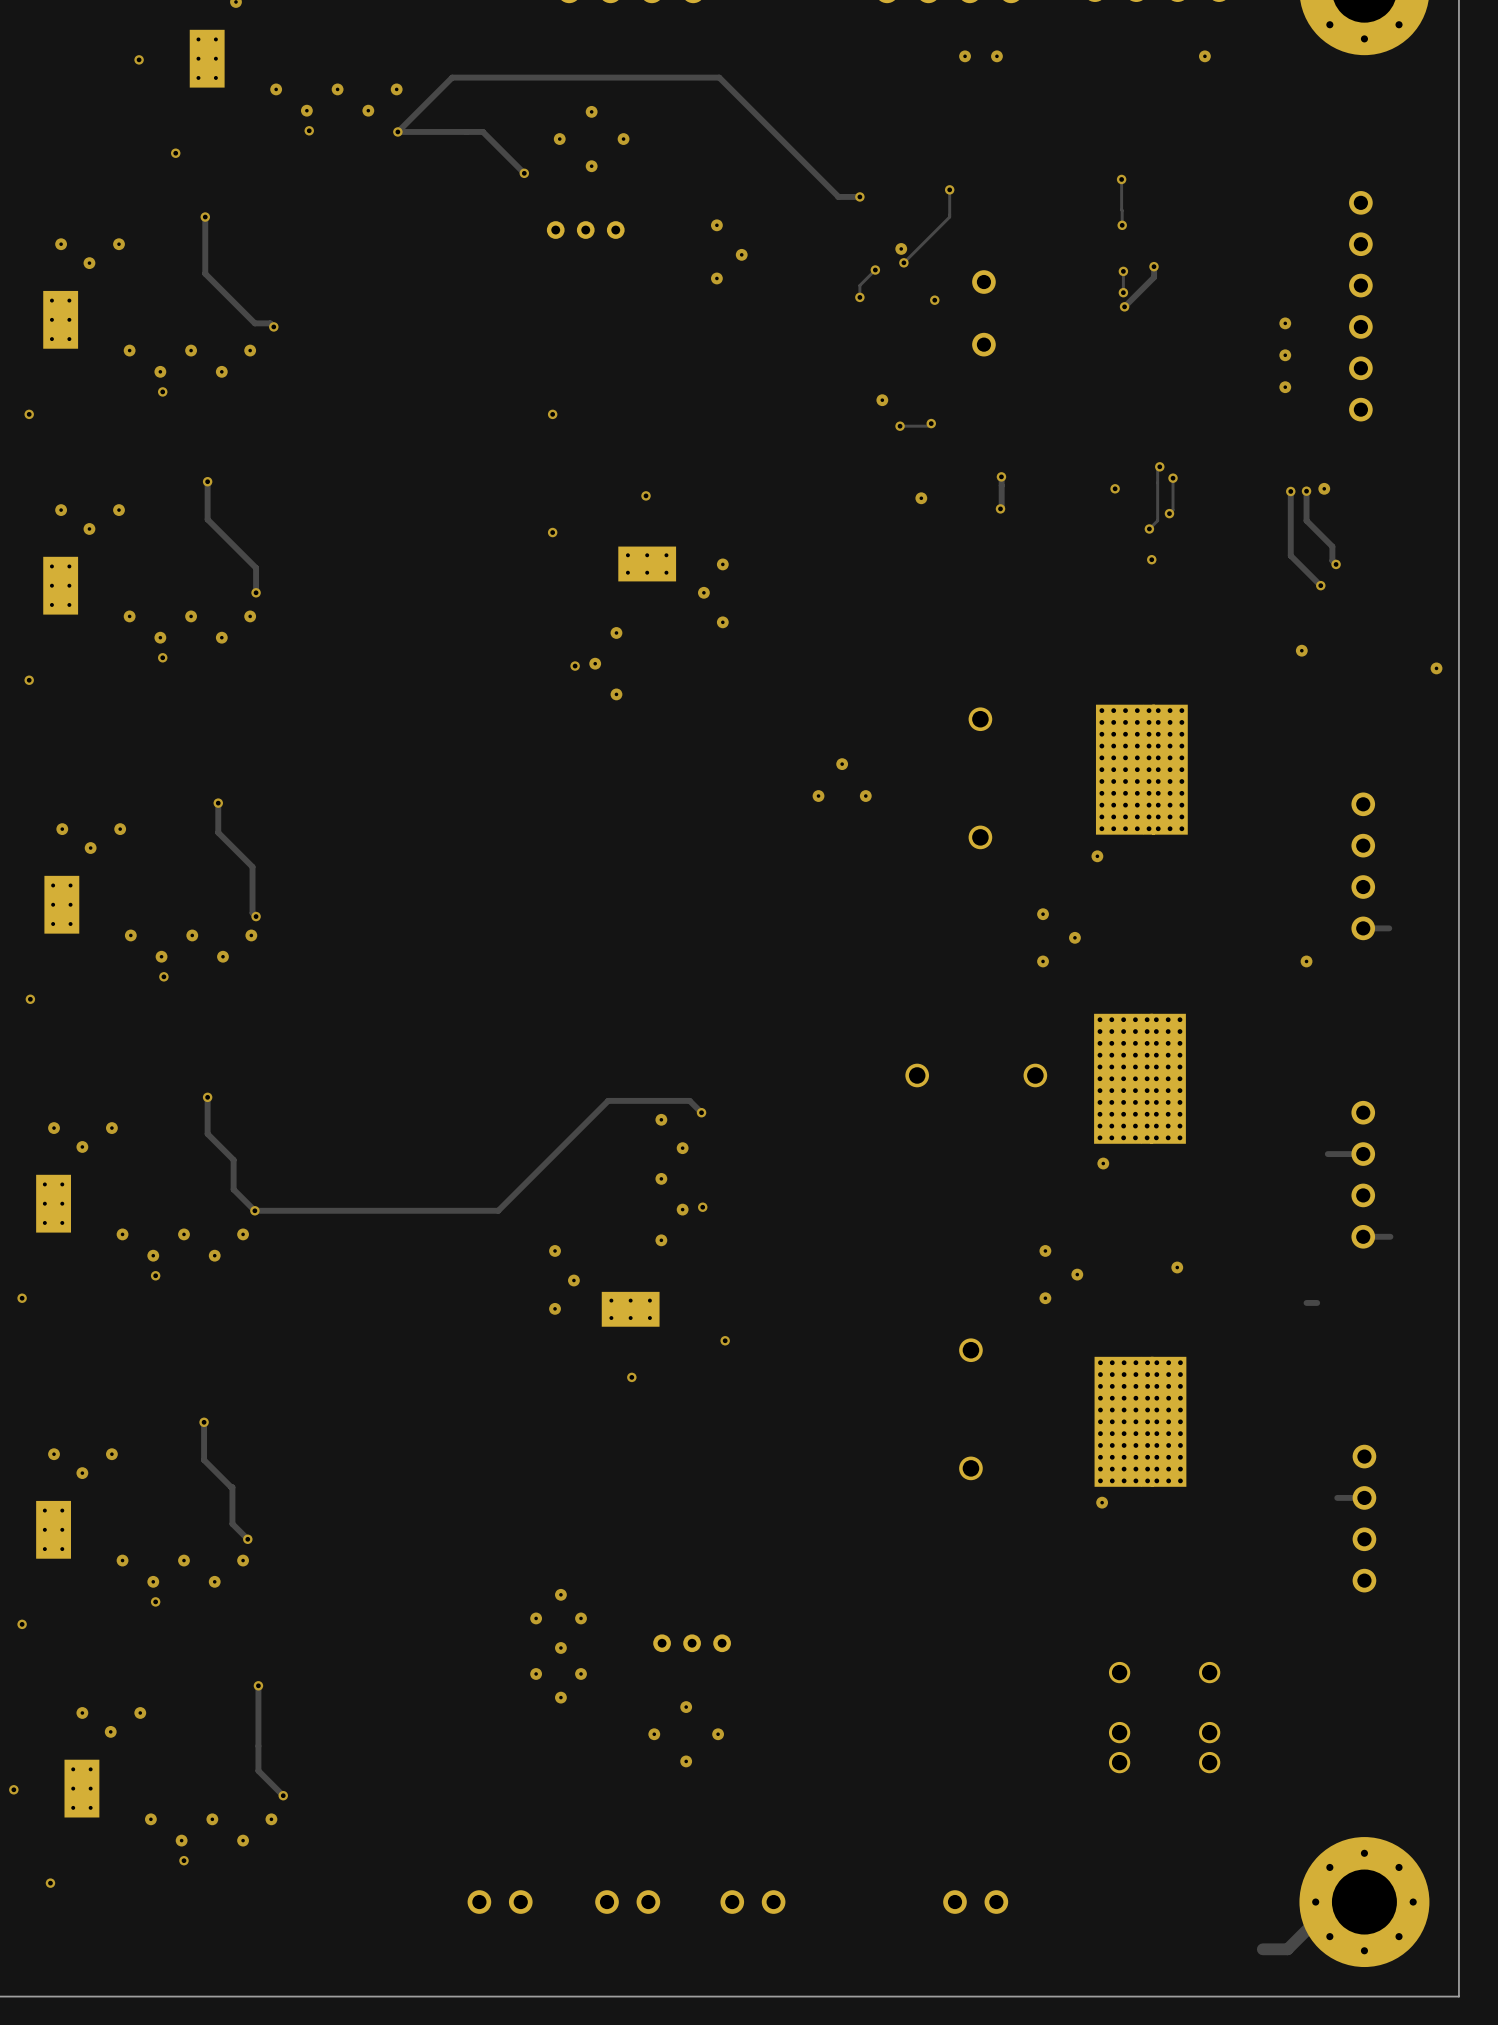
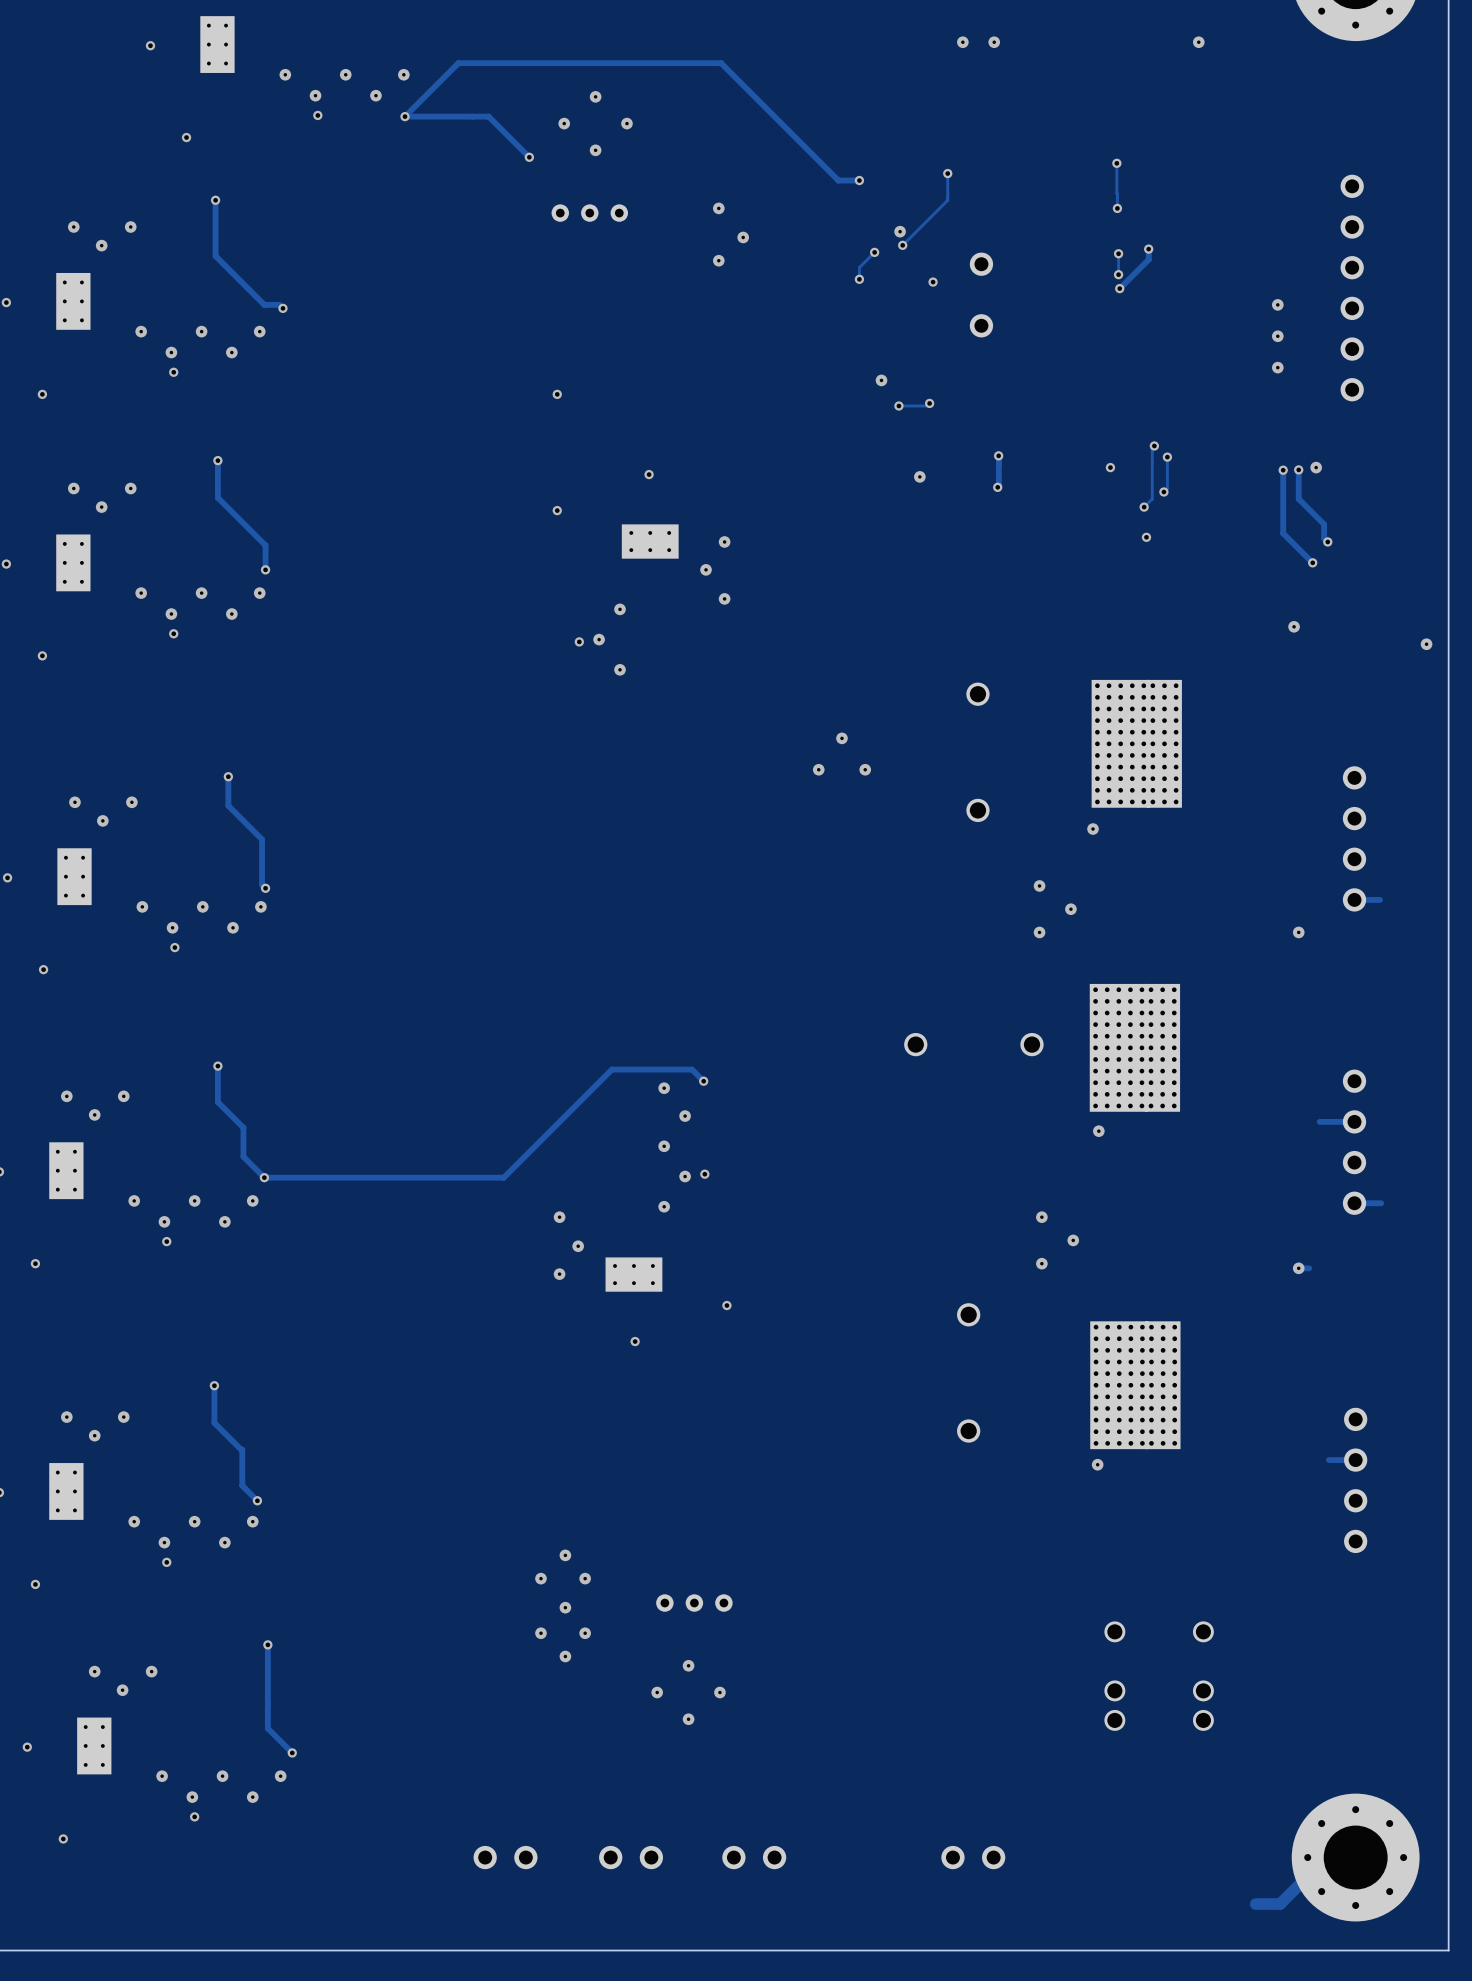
via: (1177, 1267) -> none
via: none -> (1298, 1268)

